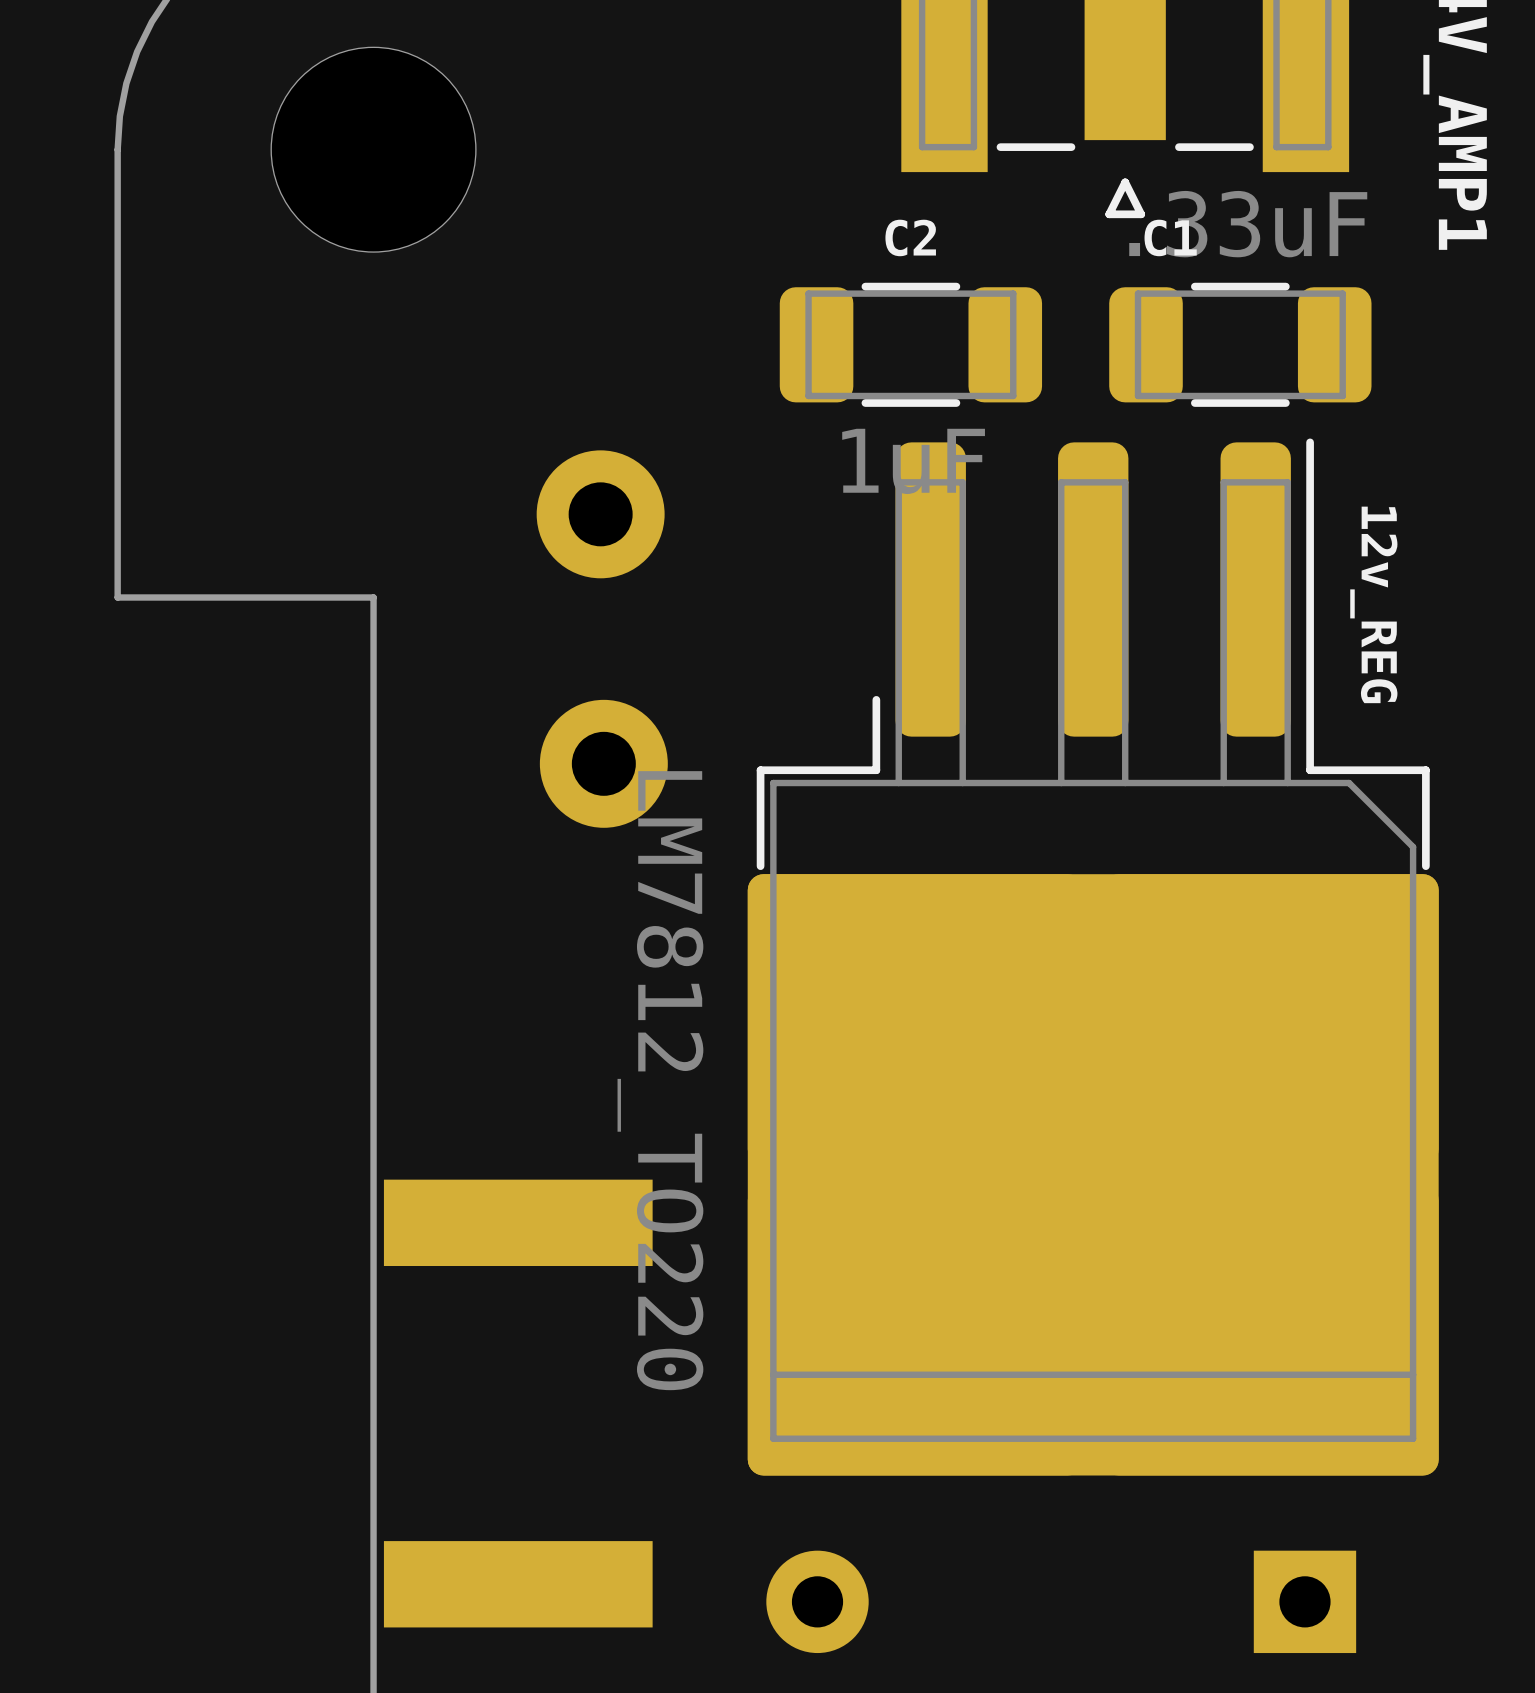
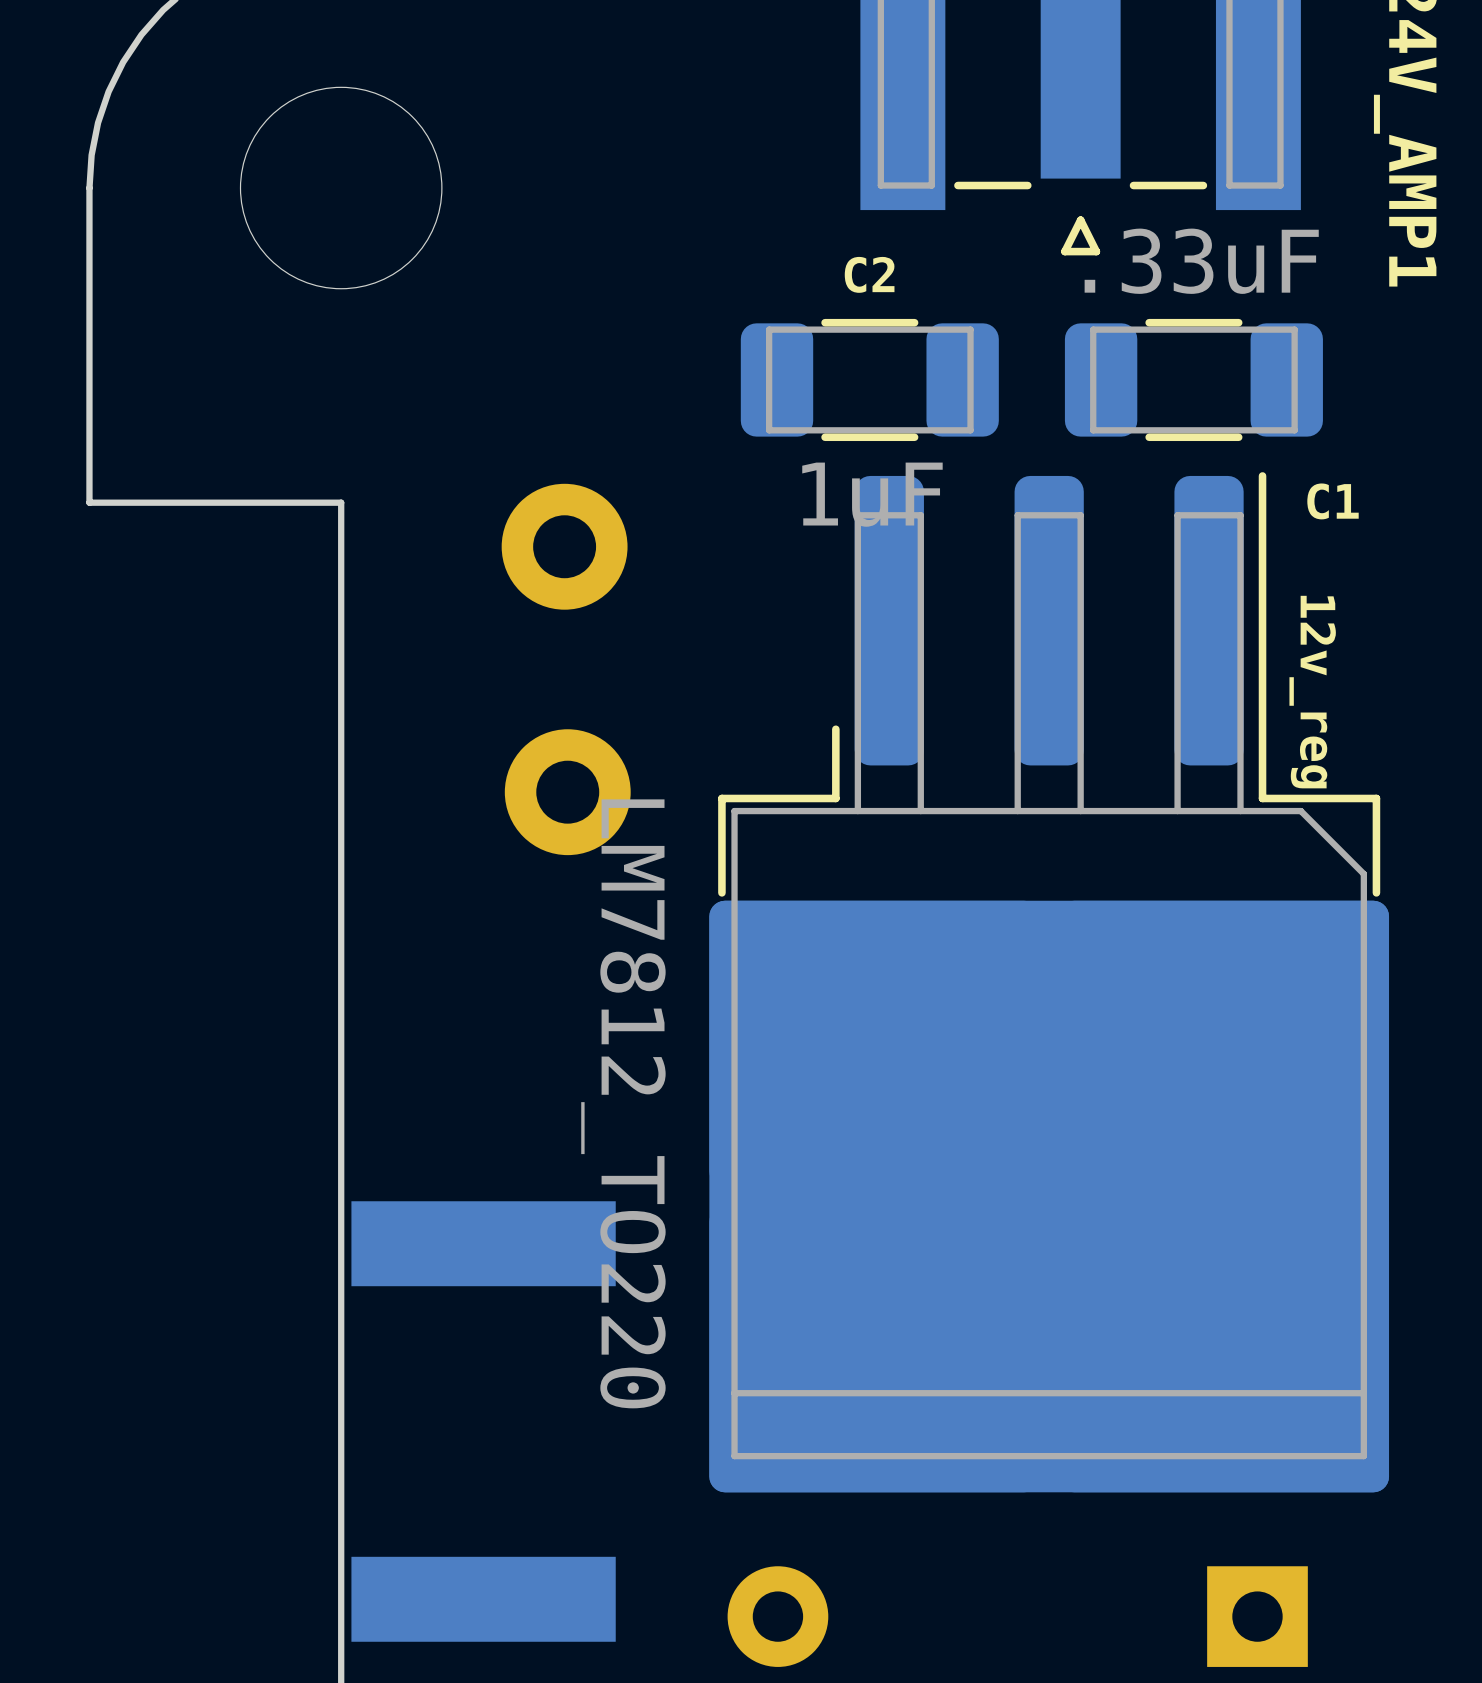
C1 name position: C1 (1170, 237) -> C1 (1333, 501)
board edge: (117, 469) (117, 597) (373, 597) -> (89, 502) (341, 502) (341, 628)
12v_REG name: 12v_REG (1373, 604) -> 12v_reg (1312, 692)

